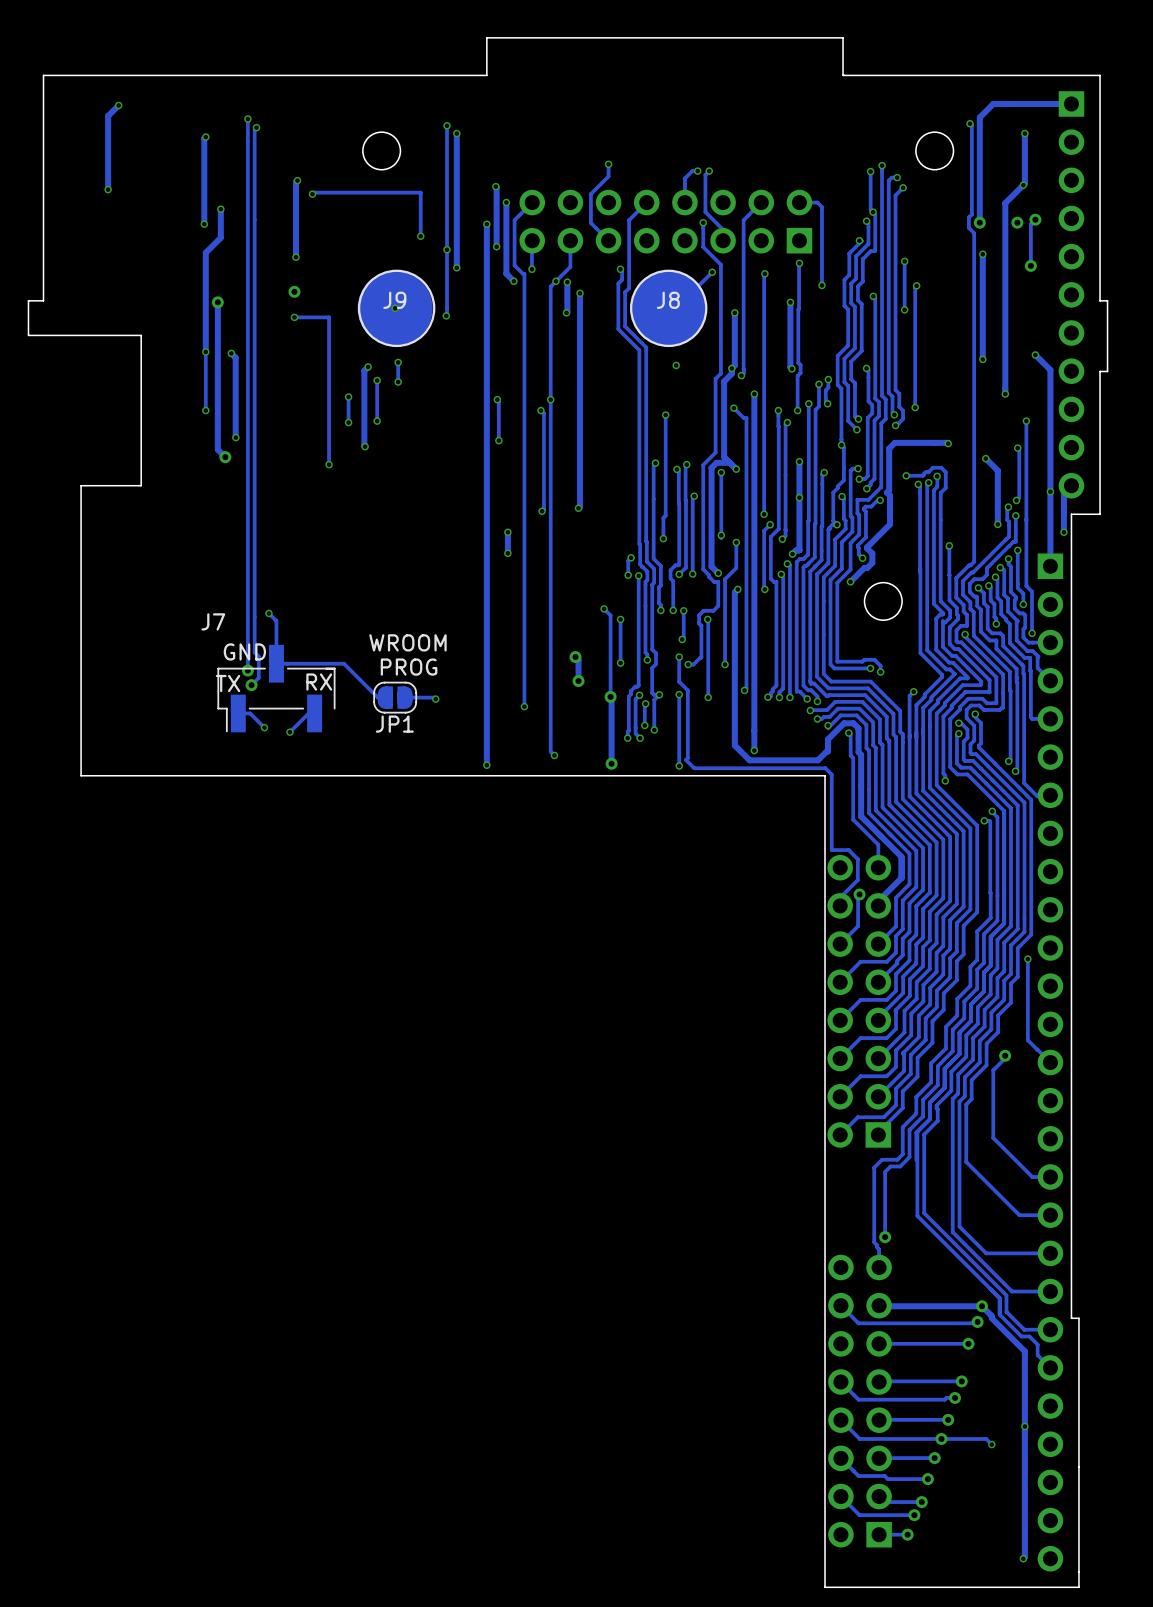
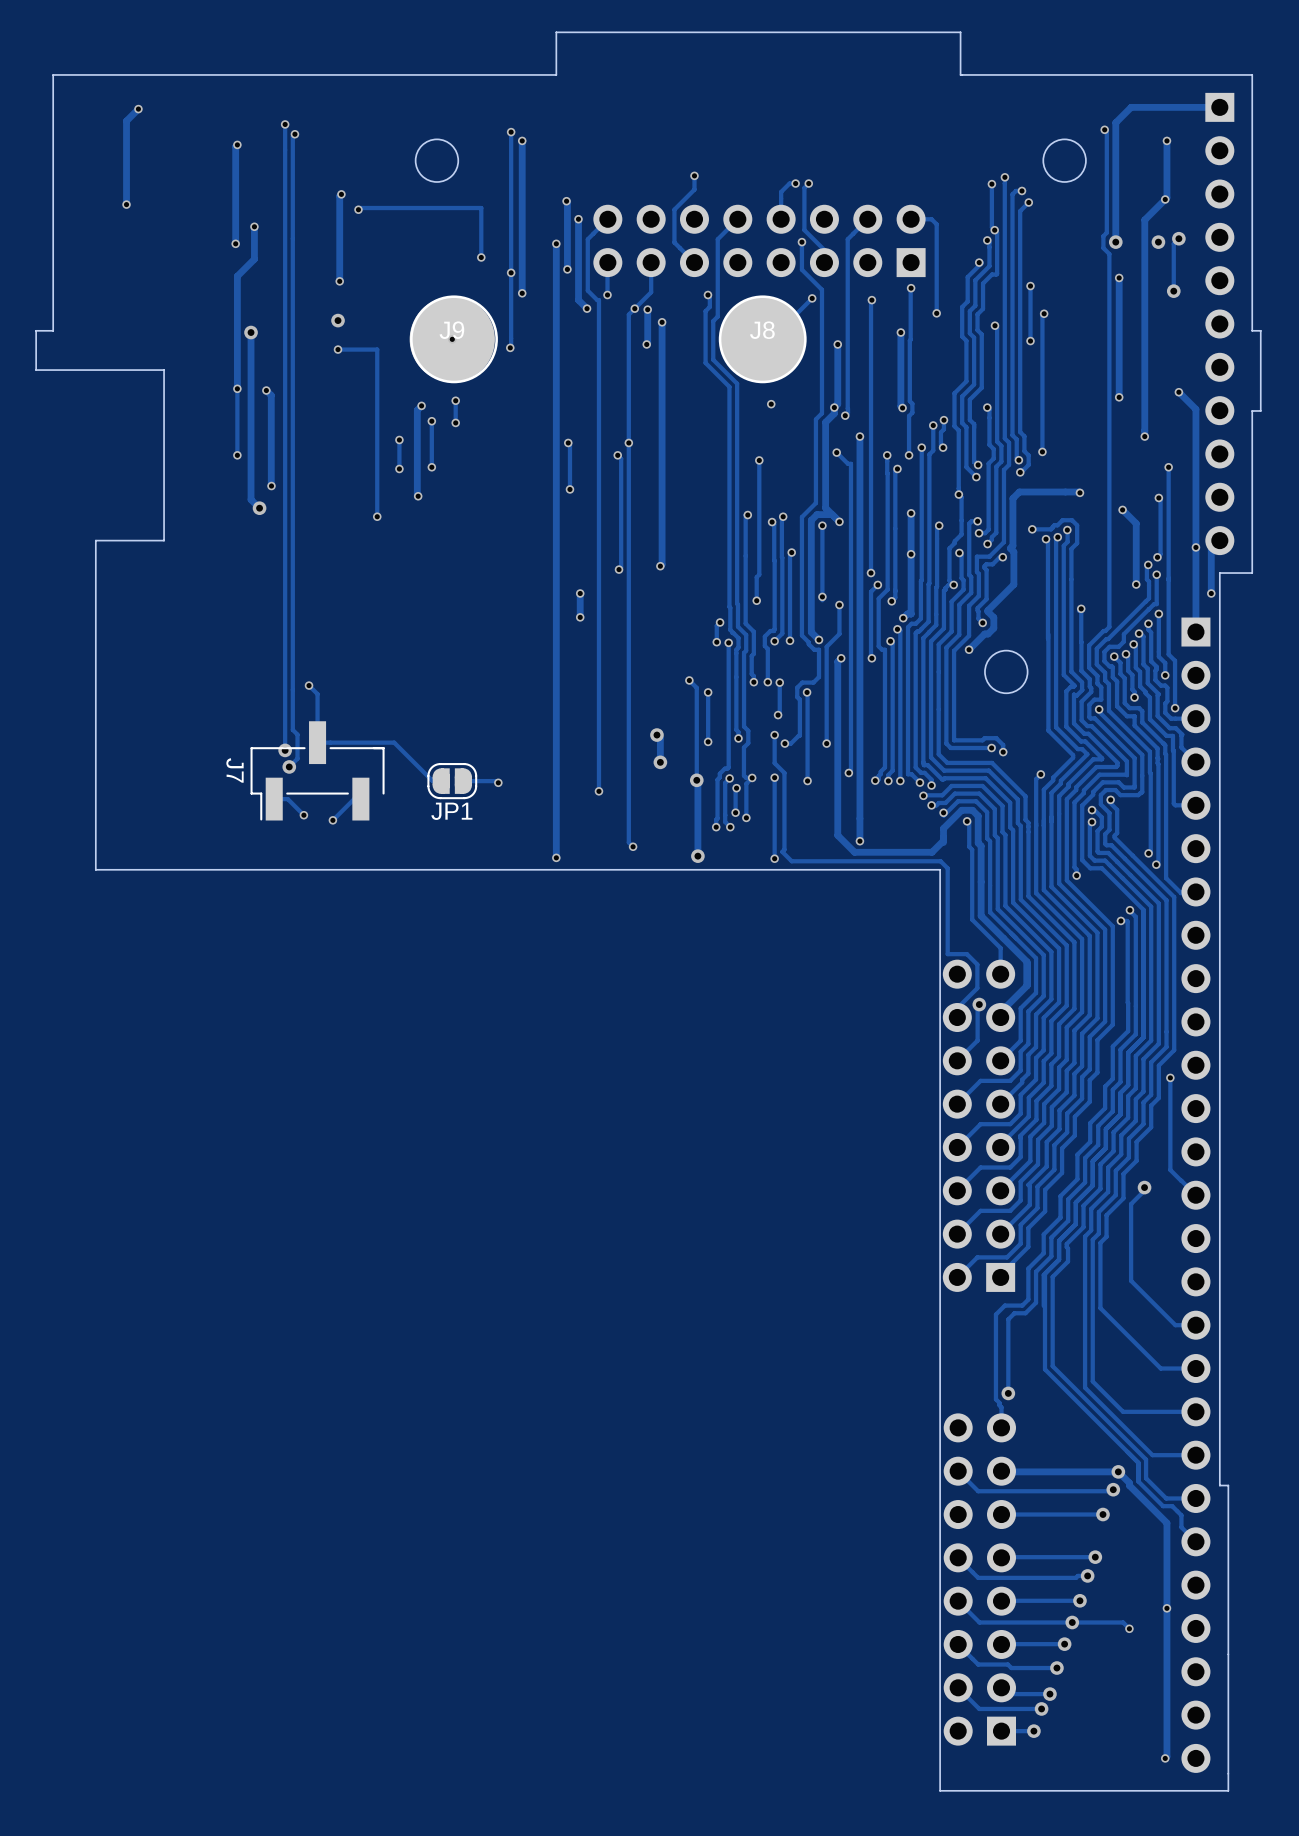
J7 name rotation: 0° (213, 621) -> 90° clockwise (235, 770)
J7 name position: J7 (213, 621) -> J7 (235, 770)
text: WROOM (407, 642) -> none
text: GND (244, 651) -> none
text: PROG (409, 667) -> none
text: RX (319, 682) -> none
text: TX (228, 683) -> none

